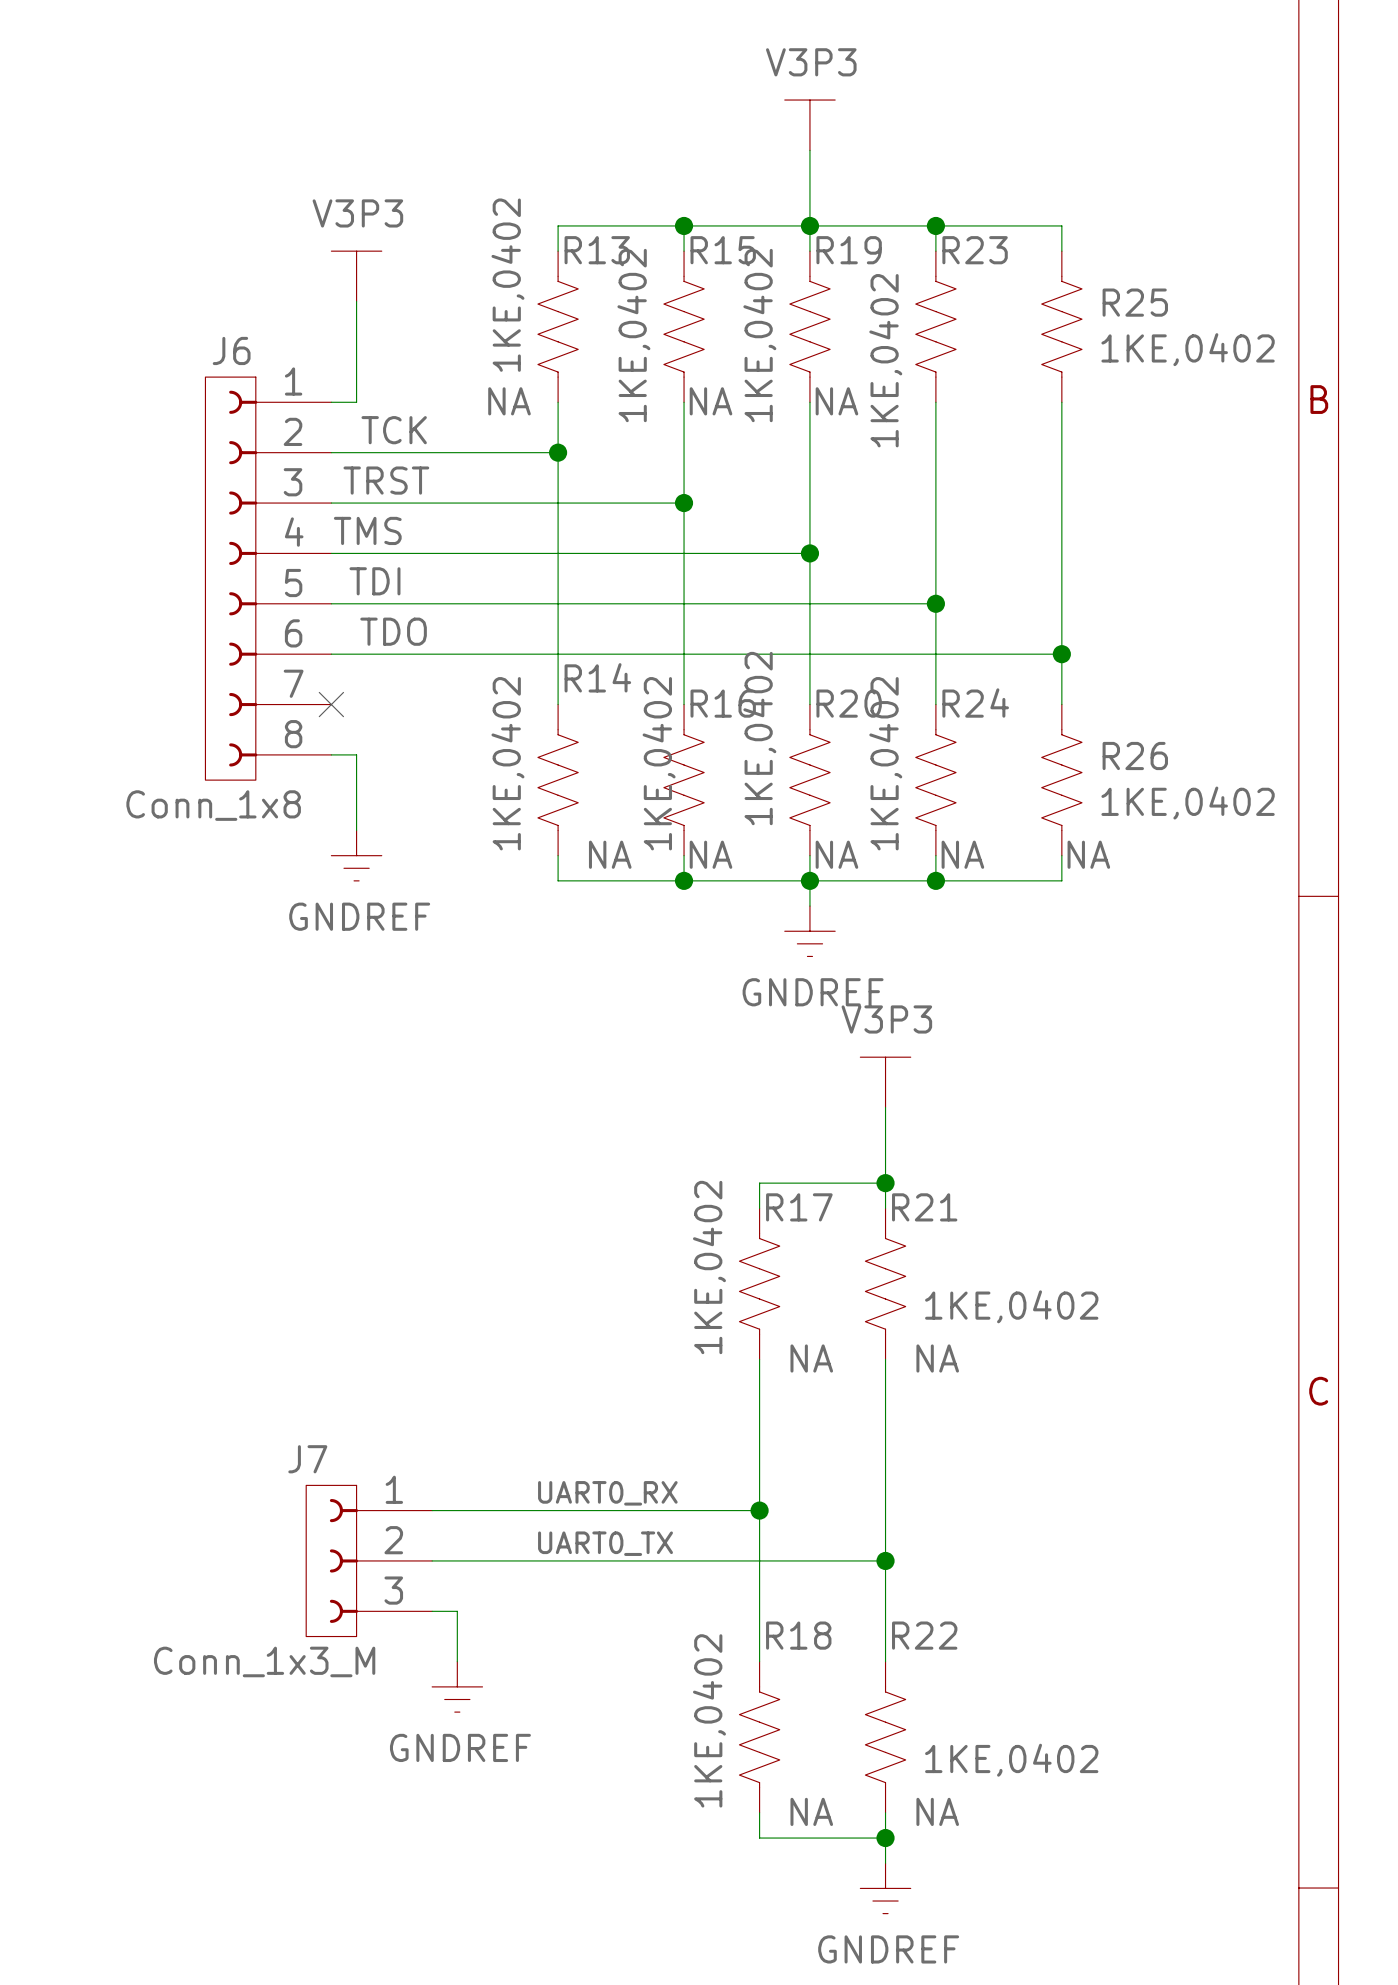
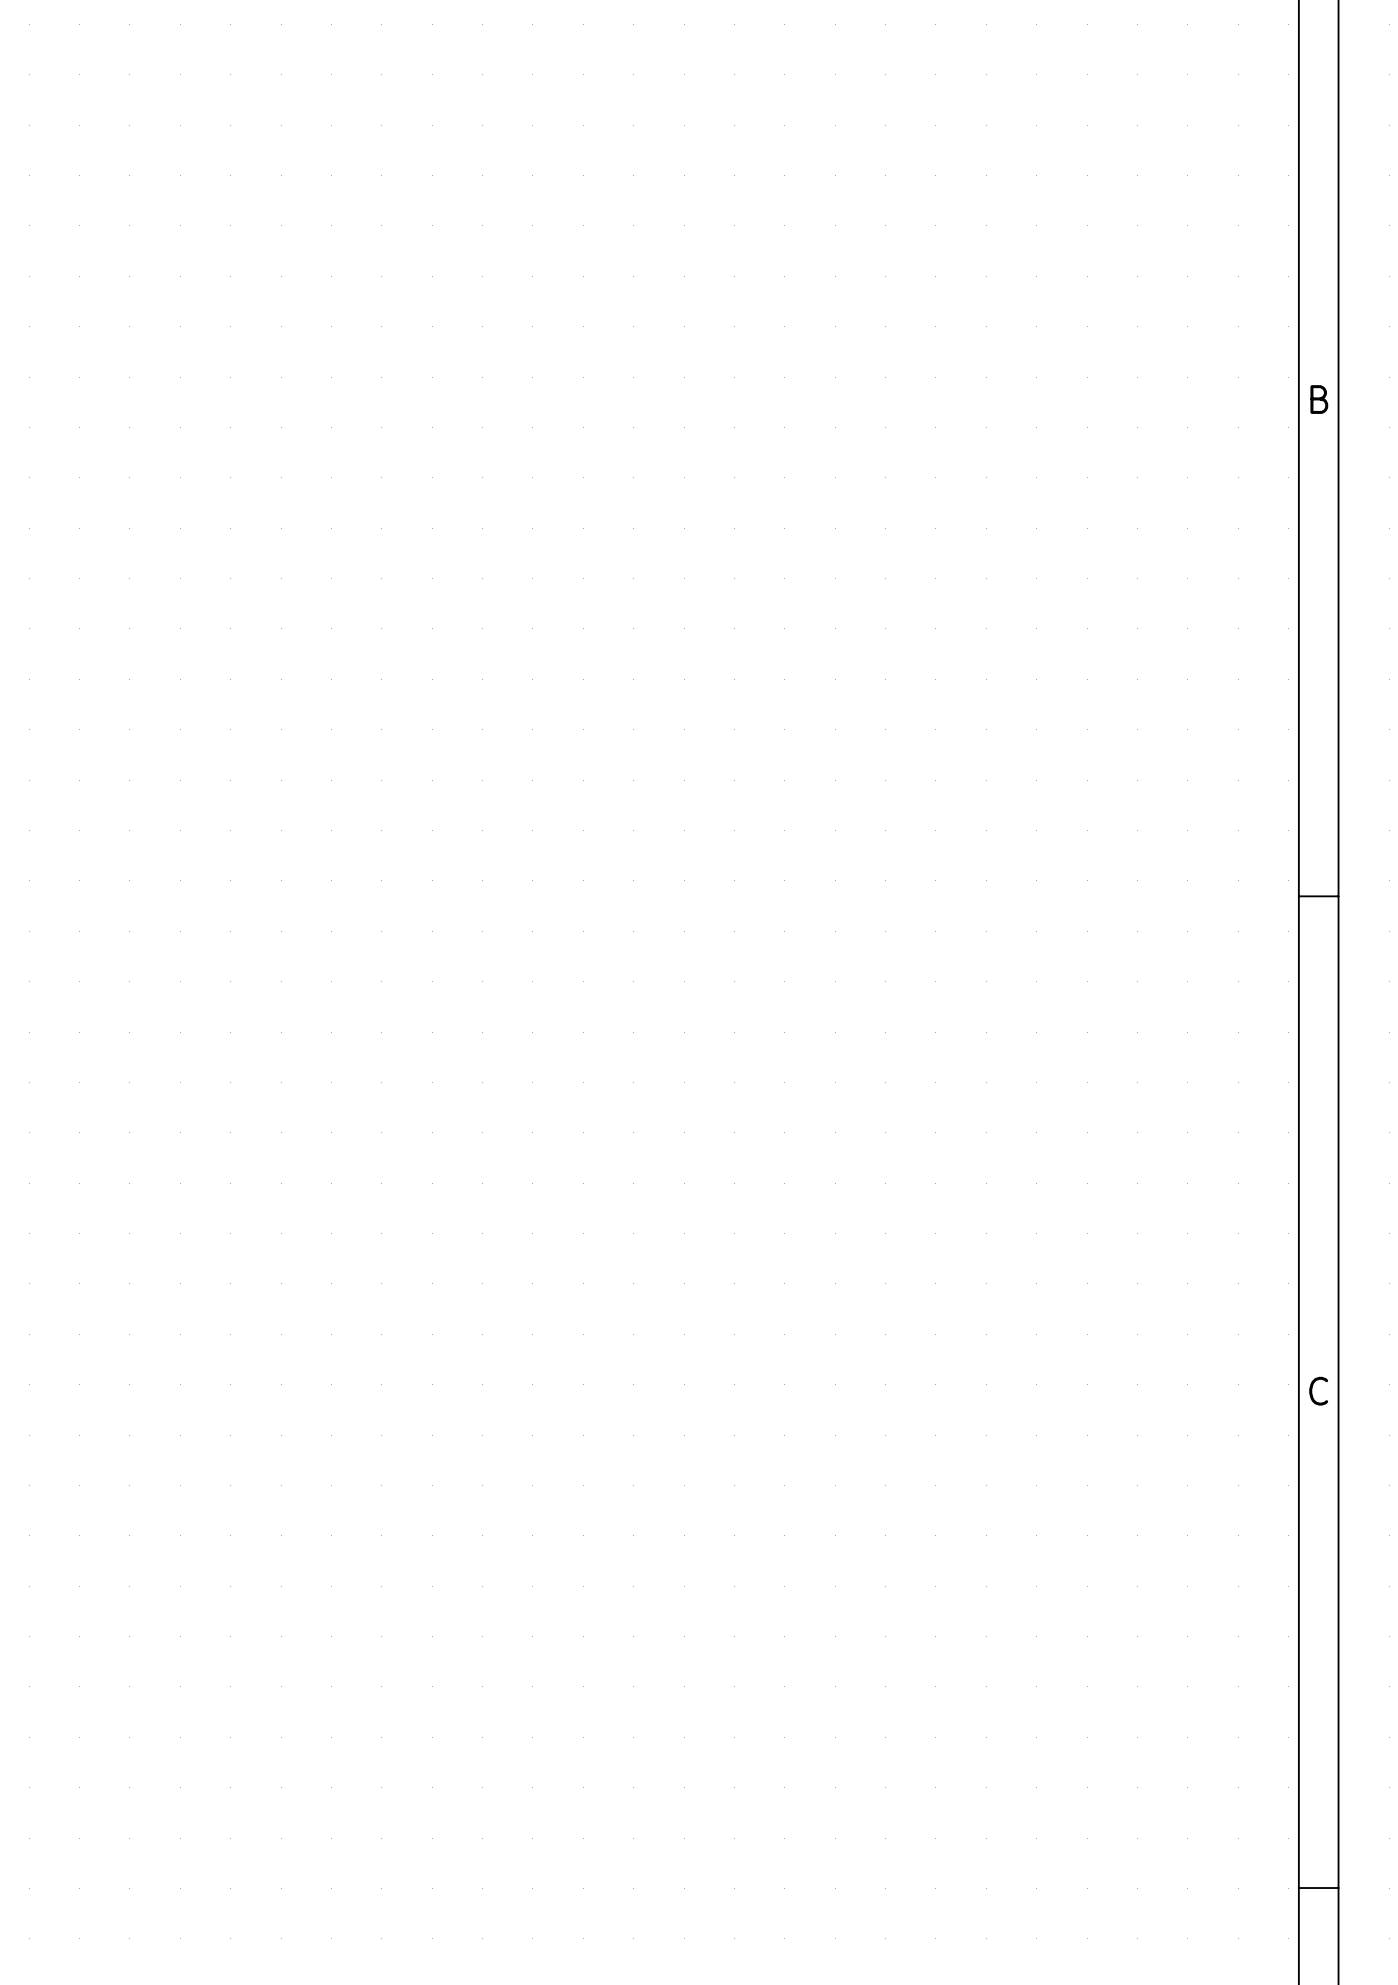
power symbol: V3P3 (809, 125) -> none
wire: (809, 150) (809, 251) -> none
wire: (684, 225) (684, 251) -> none
junction: (684, 225) -> none
junction: (809, 225) -> none
wire: (935, 225) (935, 251) -> none
junction: (935, 225) -> none
wire: (558, 251) (558, 225) (1061, 225) (1061, 251) -> none
power symbol: V3P3 (356, 276) -> none
wire: (356, 301) (356, 402) (331, 402) -> none
R13: 1KE,0402 (558, 326) -> none
R15: 1KE,0402 (684, 326) -> none
R19: 1KE,0402 (809, 326) -> none
R23: 1KE,0402 (935, 326) -> none
R25: 1KE,0402 (1061, 326) -> none
wire: (558, 402) (558, 704) -> none
wire: (684, 402) (684, 704) -> none
wire: (809, 402) (809, 704) -> none
wire: (935, 402) (935, 704) -> none
wire: (1061, 402) (1061, 704) -> none
label: TCK (394, 430) -> none
wire: (331, 452) (558, 452) -> none
junction: (558, 452) -> none
label: TRST (386, 480) -> none
wire: (331, 503) (684, 503) -> none
junction: (684, 503) -> none
label: TMS (367, 530) -> none
wire: (331, 553) (809, 553) -> none
junction: (809, 553) -> none
J6: Conn_1x8 (268, 578) -> none
label: TDI (374, 581) -> none
wire: (331, 603) (935, 603) -> none
junction: (935, 603) -> none
label: TDO (393, 631) -> none
wire: (331, 654) (1061, 654) -> none
junction: (1061, 654) -> none
no-connect mark: (331, 704) -> none
wire: (331, 754) (356, 754) (356, 830) -> none
R14: 1KE,0402 (558, 780) -> none
R16: 1KE,0402 (684, 780) -> none
R20: 1KE,0402 (809, 780) -> none
R24: 1KE,0402 (935, 780) -> none
R26: 1KE,0402 (1061, 780) -> none
power symbol: GNDREF (356, 855) -> none
wire: (558, 855) (558, 880) (1061, 880) (1061, 855) -> none
wire: (684, 855) (684, 880) -> none
wire: (809, 855) (809, 906) -> none
wire: (935, 855) (935, 880) -> none
junction: (684, 880) -> none
junction: (809, 880) -> none
junction: (935, 880) -> none
power symbol: GNDREF (809, 931) -> none
power symbol: V3P3 (885, 1082) -> none
wire: (885, 1107) (885, 1208) -> none
wire: (885, 1183) (759, 1183) (759, 1208) -> none
junction: (885, 1183) -> none
R17: 1KE,0402 (759, 1283) -> none
R21: 1KE,0402 (885, 1283) -> none
wire: (759, 1359) (759, 1661) -> none
wire: (885, 1359) (885, 1661) -> none
label: UART0_RX (607, 1493) -> none
wire: (432, 1510) (759, 1510) -> none
junction: (759, 1510) -> none
label: UART0_TX (605, 1543) -> none
J7: Conn_1x3_M (369, 1560) -> none
wire: (432, 1560) (885, 1560) -> none
junction: (885, 1560) -> none
wire: (432, 1611) (457, 1611) (457, 1661) -> none
power symbol: GNDREF (457, 1686) -> none
R18: 1KE,0402 (759, 1737) -> none
R22: 1KE,0402 (885, 1737) -> none
wire: (759, 1812) (759, 1838) (885, 1838) -> none
wire: (885, 1812) (885, 1863) -> none
junction: (885, 1838) -> none
power symbol: GNDREF (885, 1888) -> none

